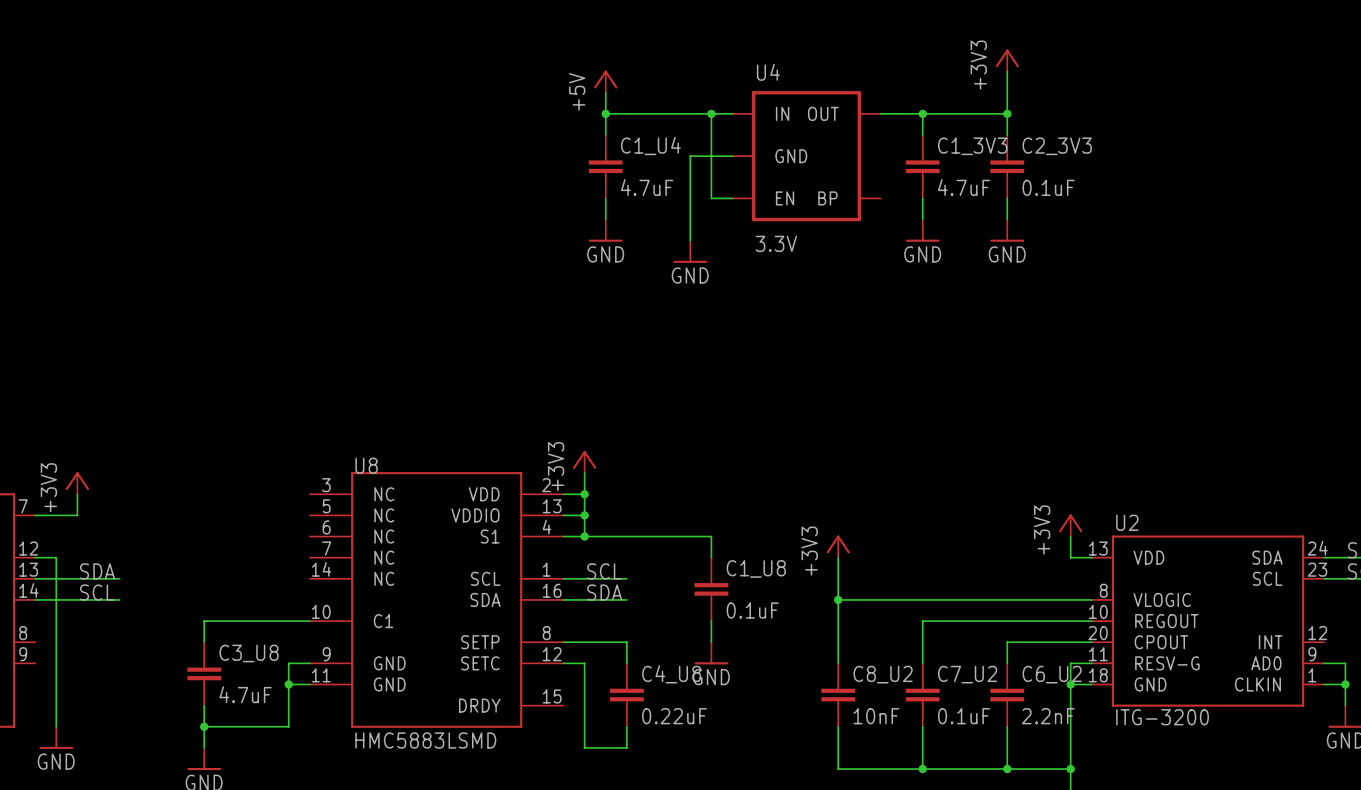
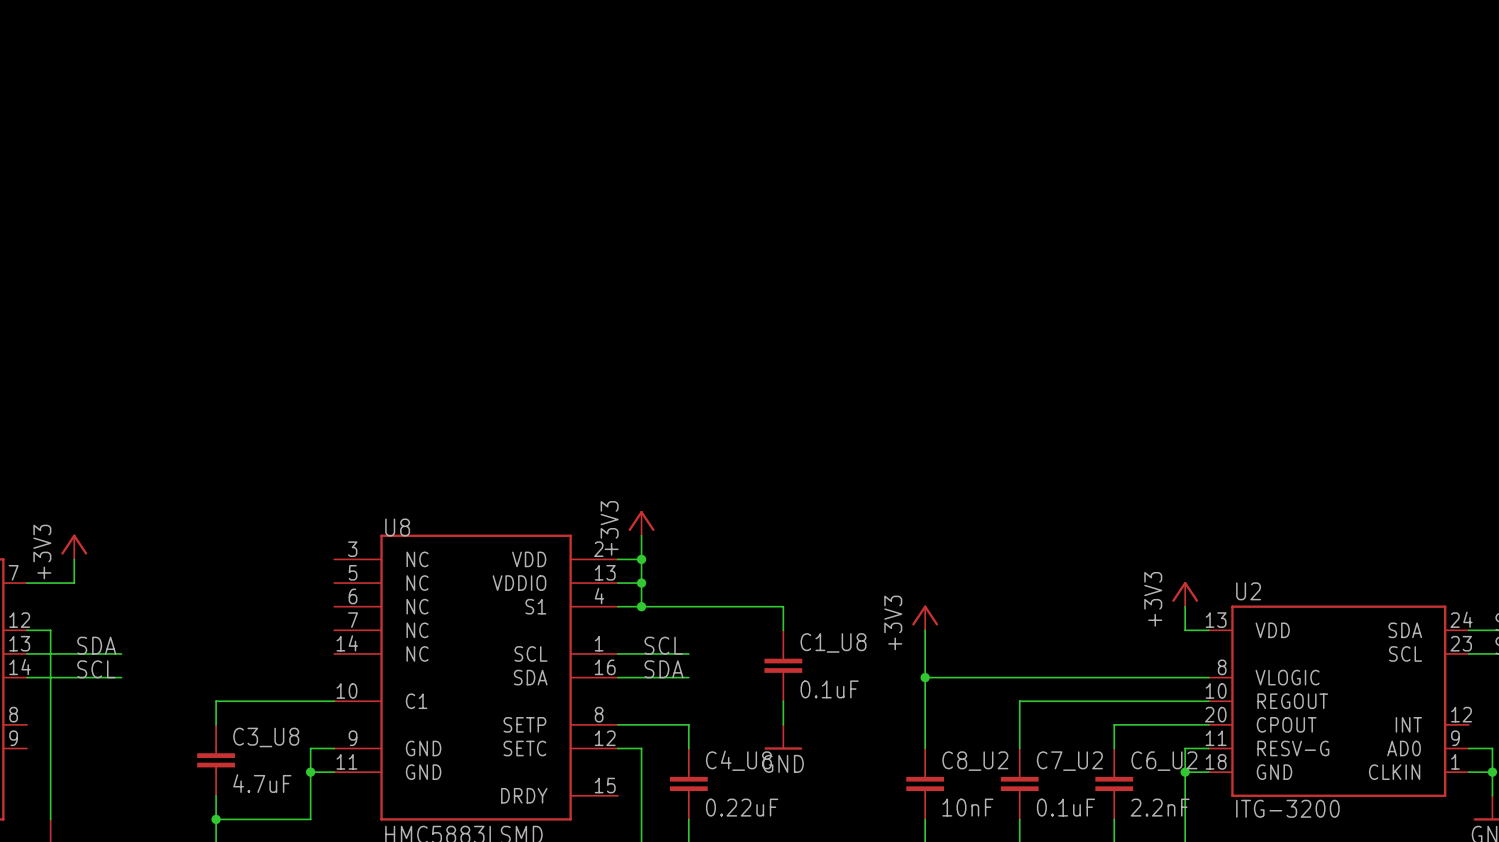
power symbol: +3V3 (1007, 60) -> none
wire: (1007, 71) (1007, 135) -> none
power symbol: +5V (605, 81) -> none
wire: (605, 92) (605, 135) -> none
wire: (605, 113) (732, 113) -> none
junction: (605, 113) -> none
wire: (711, 113) (711, 198) (732, 198) -> none
junction: (711, 113) -> none
wire: (880, 113) (1007, 113) -> none
wire: (922, 113) (922, 135) -> none
junction: (922, 113) -> none
junction: (1007, 113) -> none
wire: (732, 156) (690, 156) (690, 240) -> none
U4: 3.3V (806, 156) -> none
C1_U4: 4.7uF (605, 166) -> none
C1_3V3: 4.7uF (922, 166) -> none
C2_3V3: 0.1uF (1007, 166) -> none
wire: (605, 198) (605, 219) -> none
wire: (922, 198) (922, 219) -> none
wire: (1007, 198) (1007, 219) -> none
power symbol: GND (605, 230) -> none
power symbol: GND (922, 230) -> none
power symbol: GND (1007, 230) -> none
power symbol: GND (690, 251) -> none

